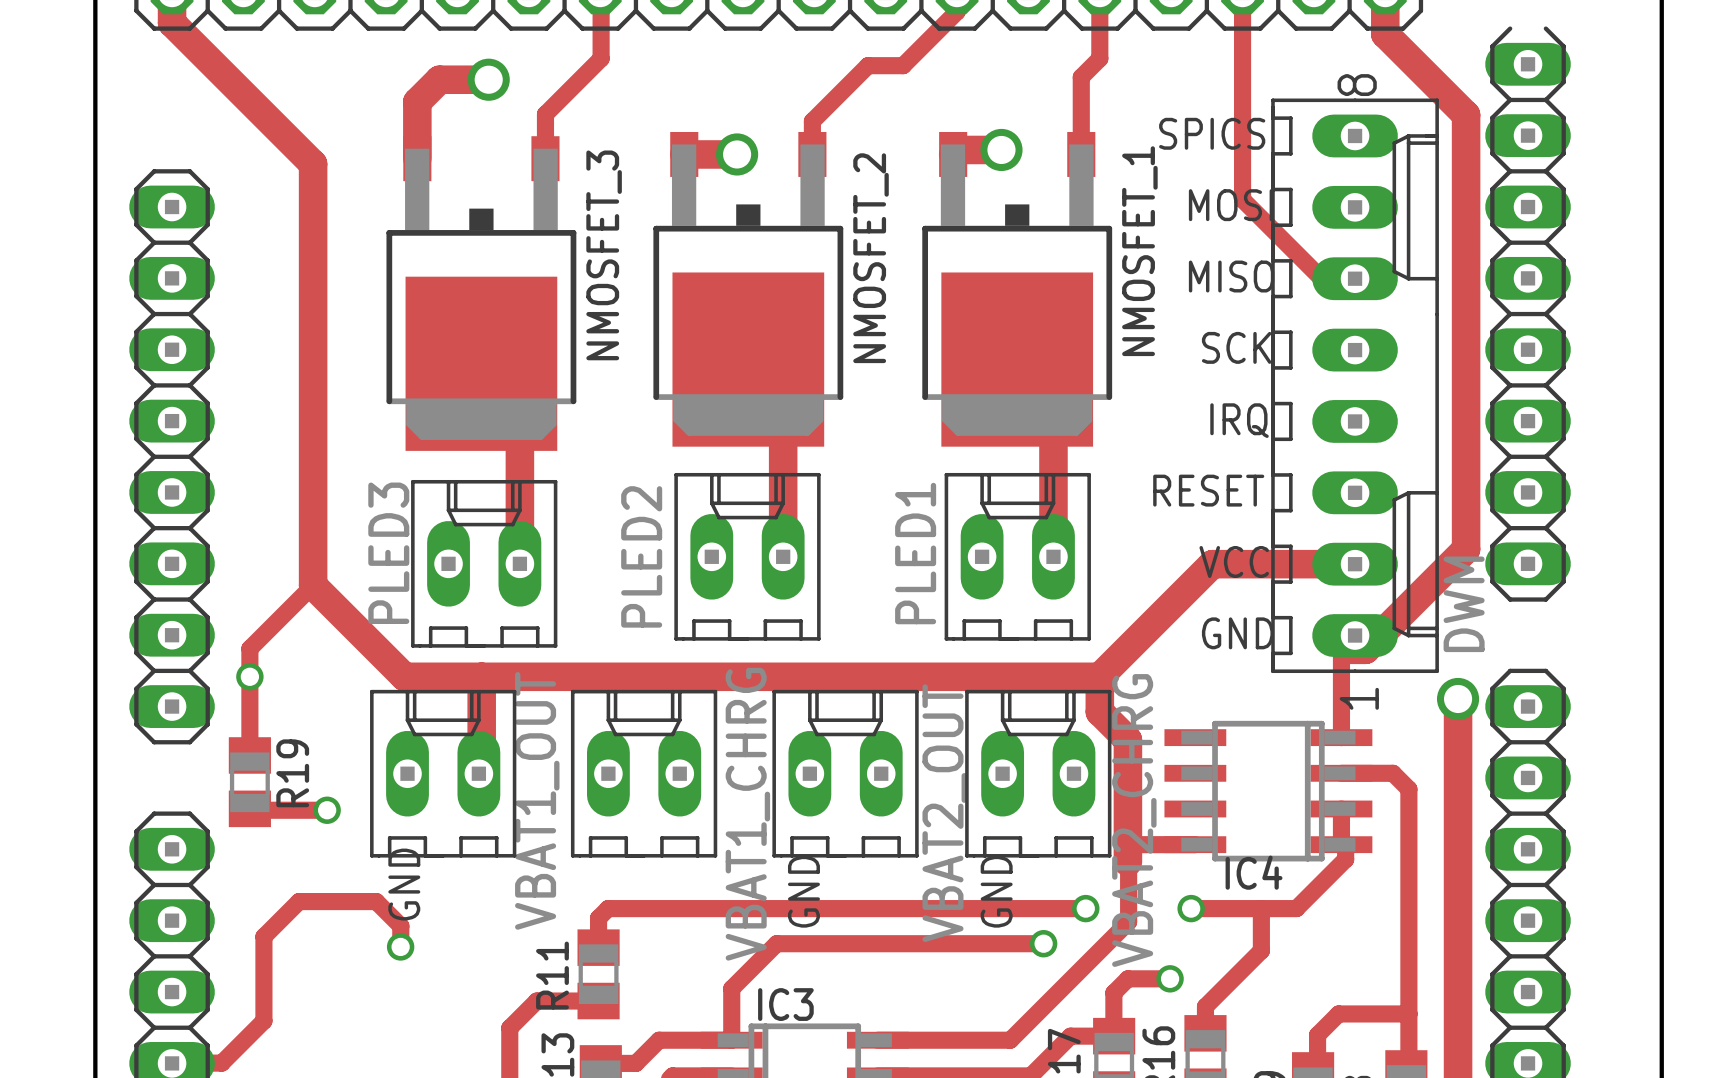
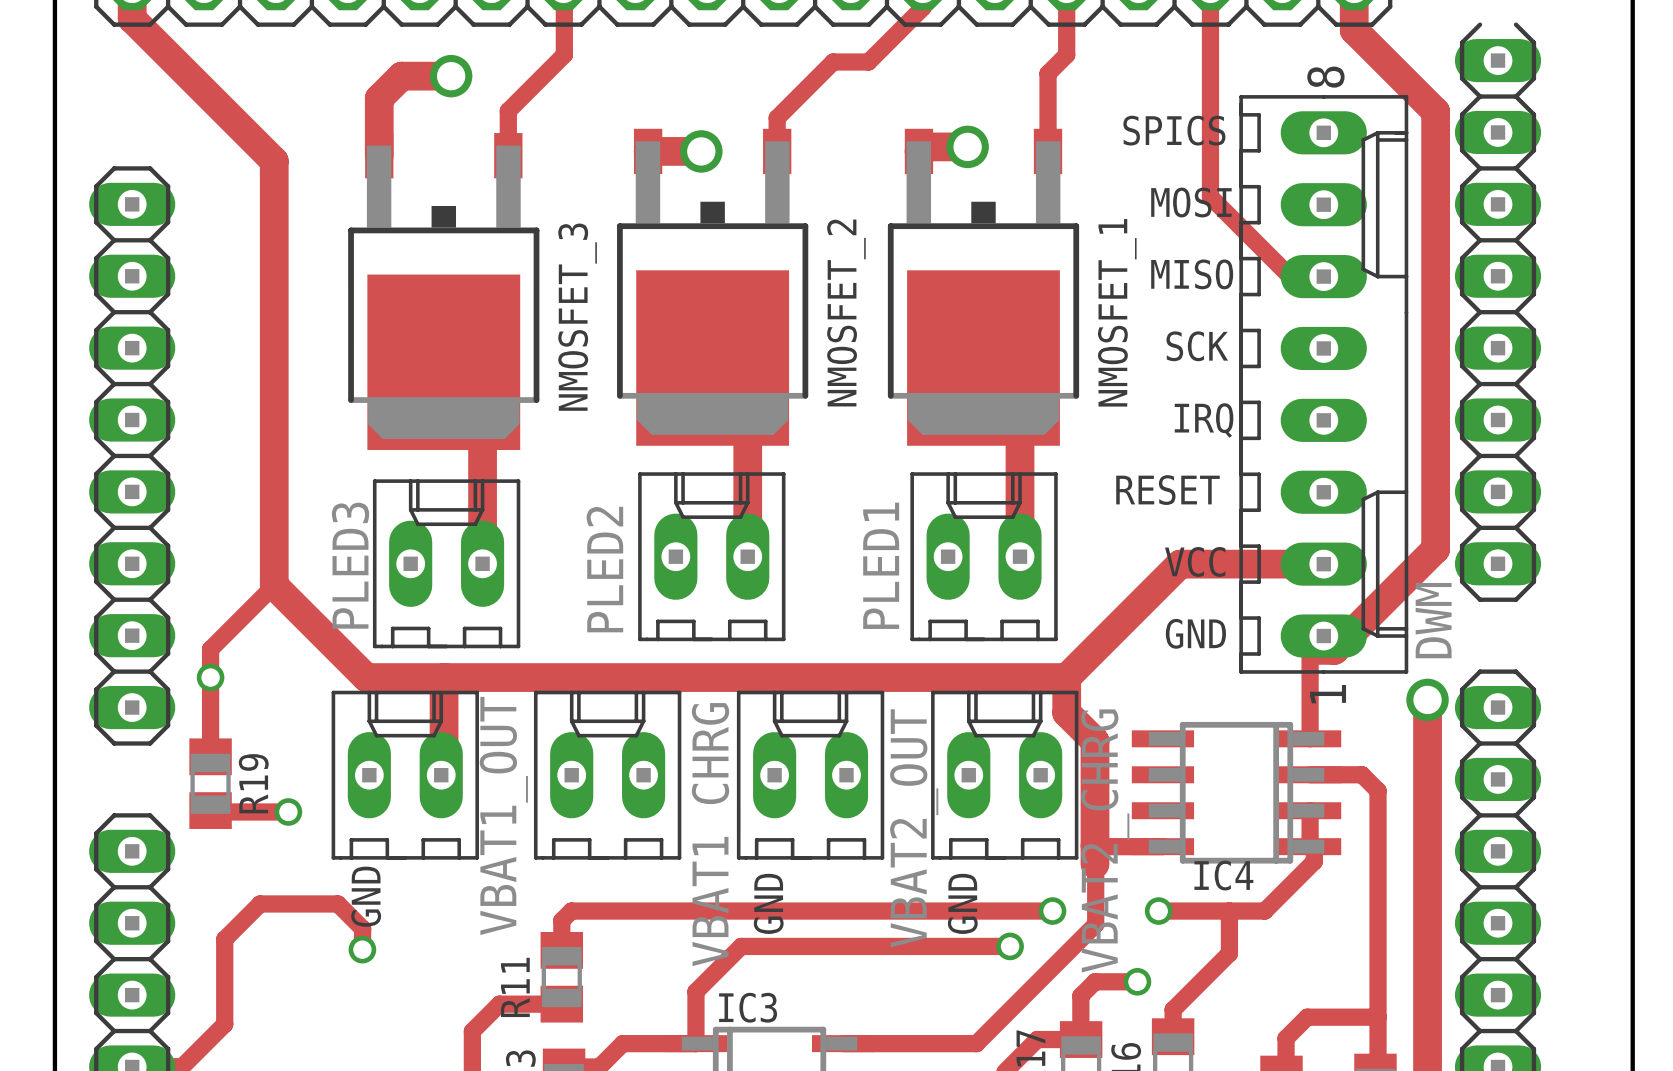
NMOSFET_1 name position: NMOSFET_1 (1139, 251) -> NMOSFET_1 (1117, 312)
NMOSFET_3 name position: NMOSFET_3 (604, 255) -> NMOSFET_3 (577, 317)
NMOSFET_2 name position: NMOSFET_2 (871, 258) -> NMOSFET_2 (846, 313)

